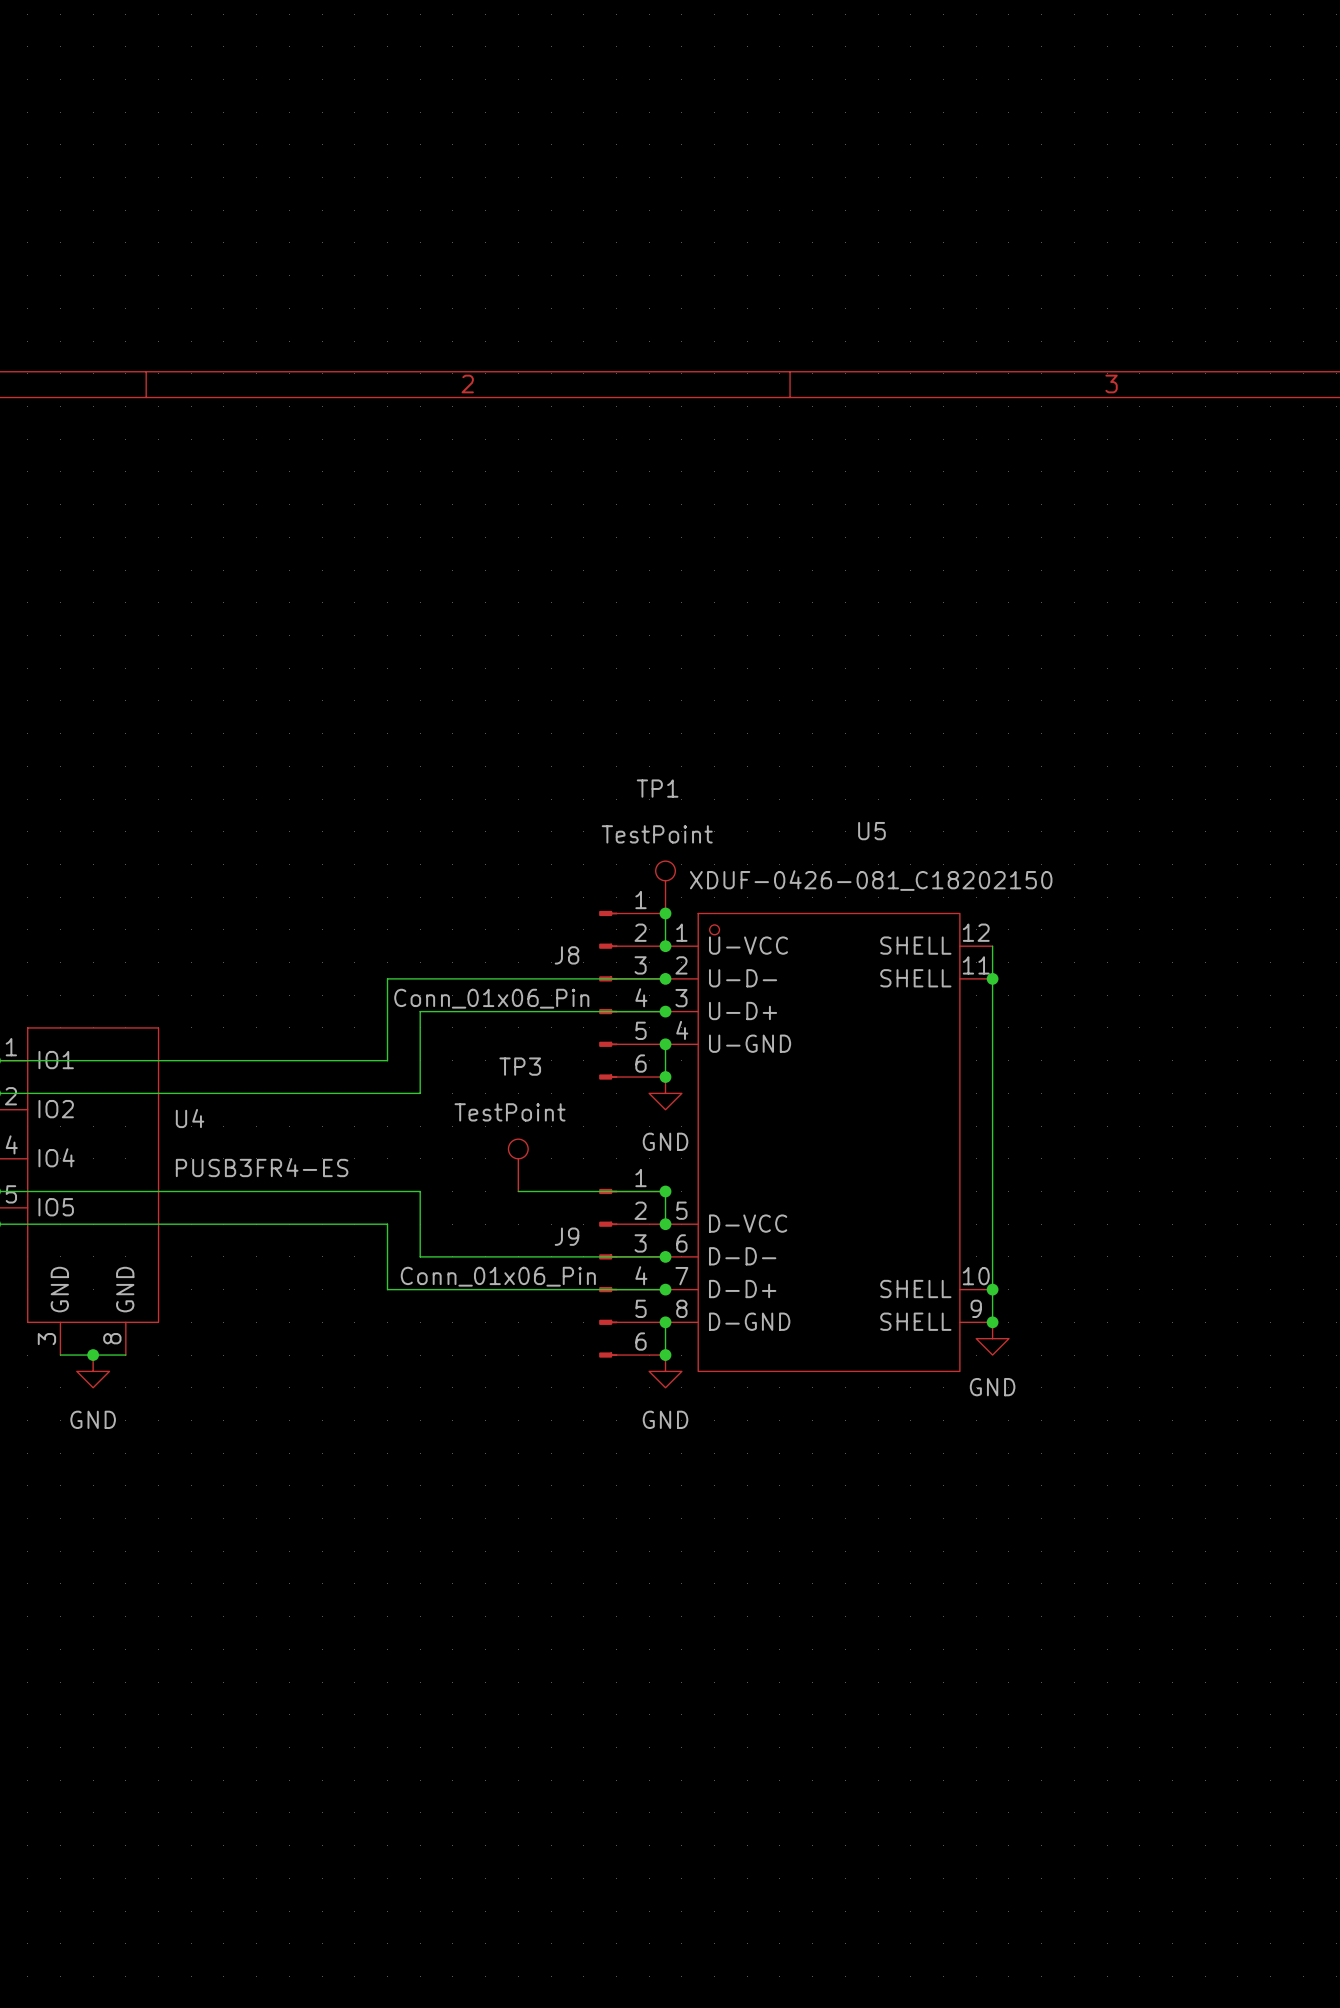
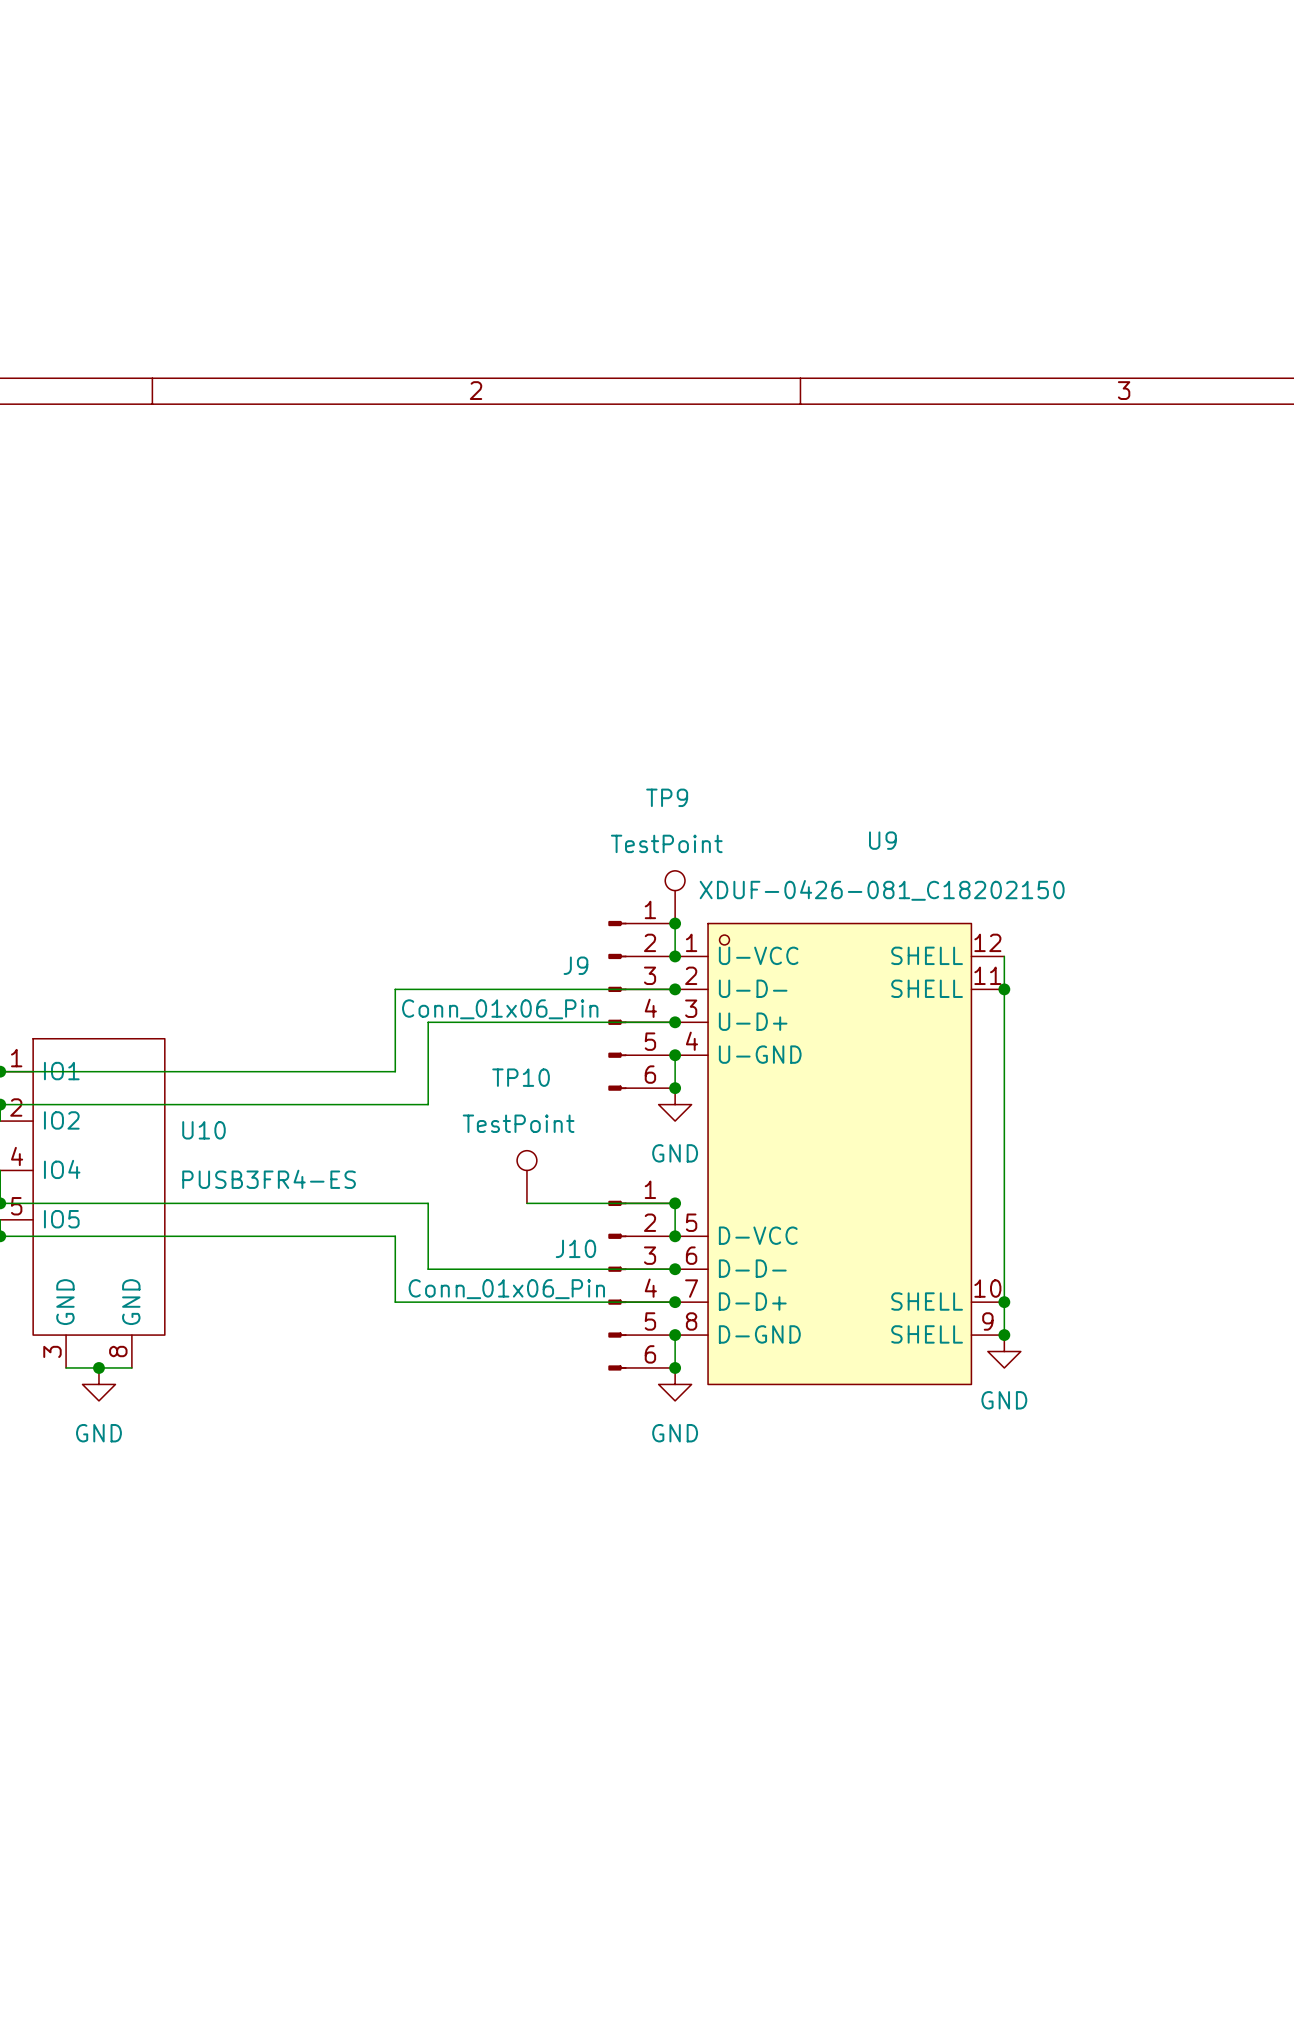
TP1 name: TP1 (657, 788) -> TP9 (667, 797)
U5 name: U5 (871, 831) -> U9 (882, 840)
J8 name: J8 (567, 955) -> J9 (575, 965)
TP3 name: TP3 (520, 1066) -> TP10 (521, 1077)
U4 name: U4 (190, 1118) -> U10 (203, 1130)
J9 name: J9 (567, 1236) -> J10 (575, 1248)

